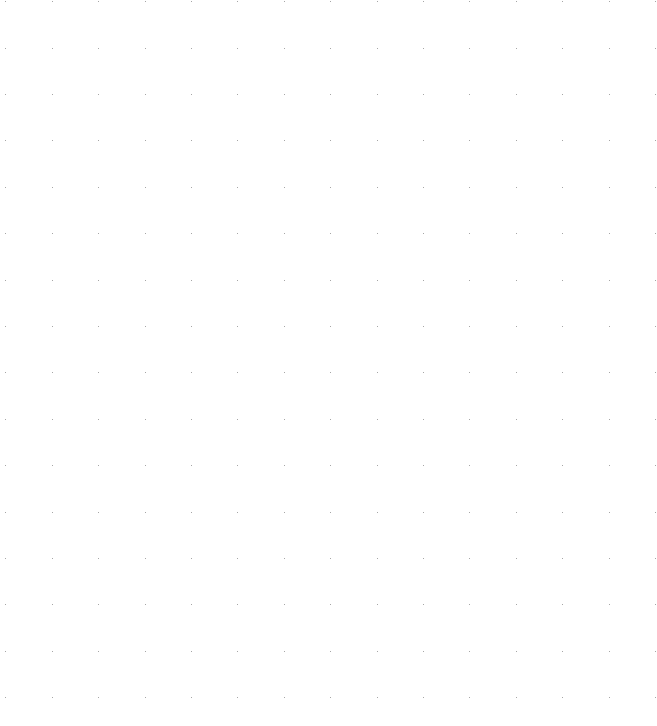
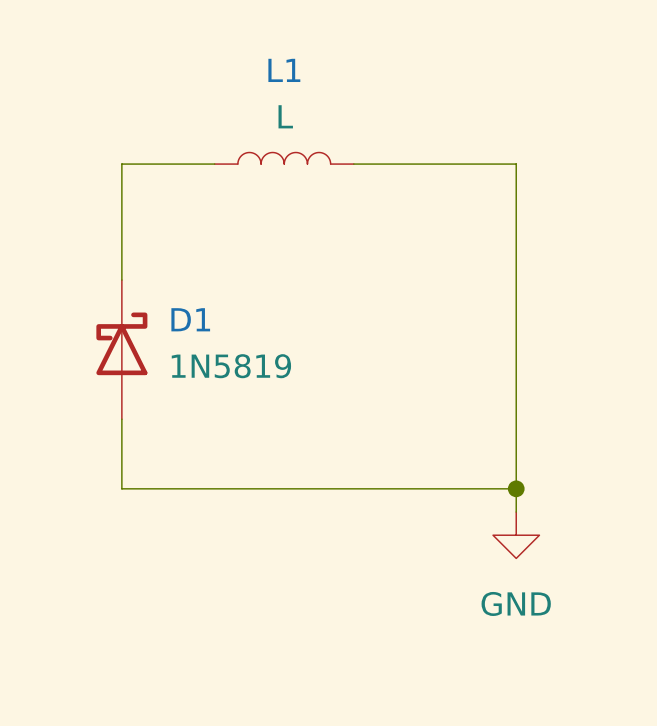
L1: none -> L (284, 158)
wire: none -> (214, 164) (121, 164) (121, 280)
wire: none -> (353, 164) (516, 164) (516, 512)
D1: none -> 1N5819 (121, 349)
wire: none -> (121, 419) (121, 488) (516, 488)
junction: none -> (516, 488)
power symbol: none -> GND (516, 535)

